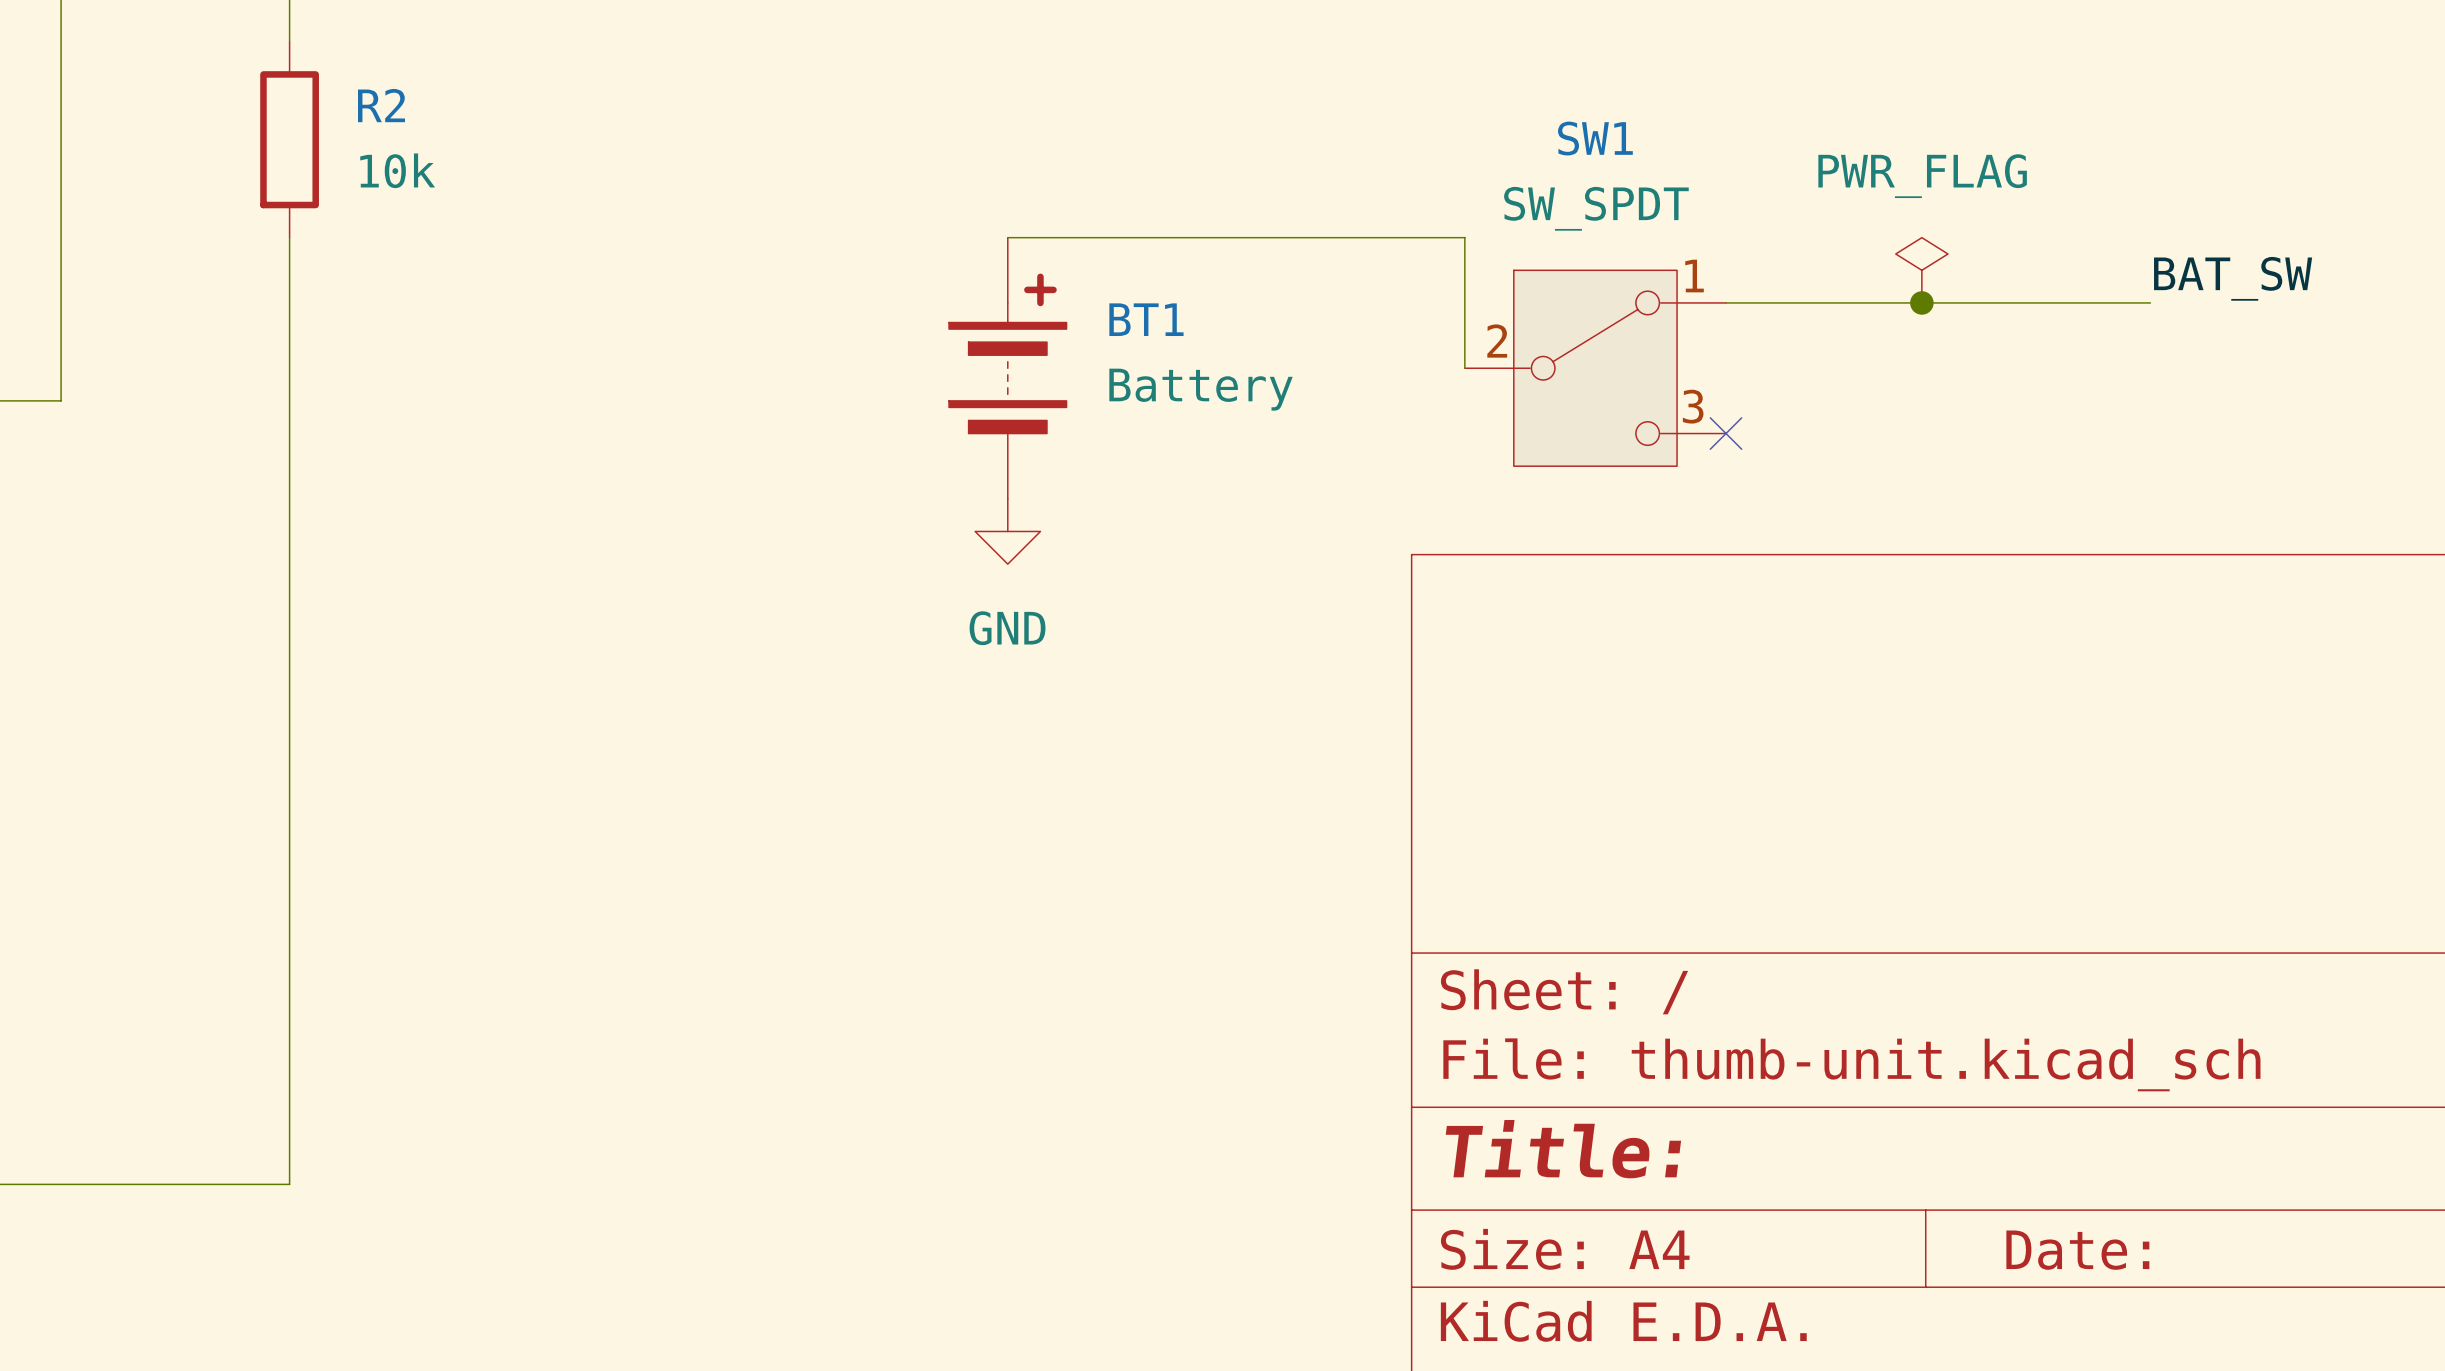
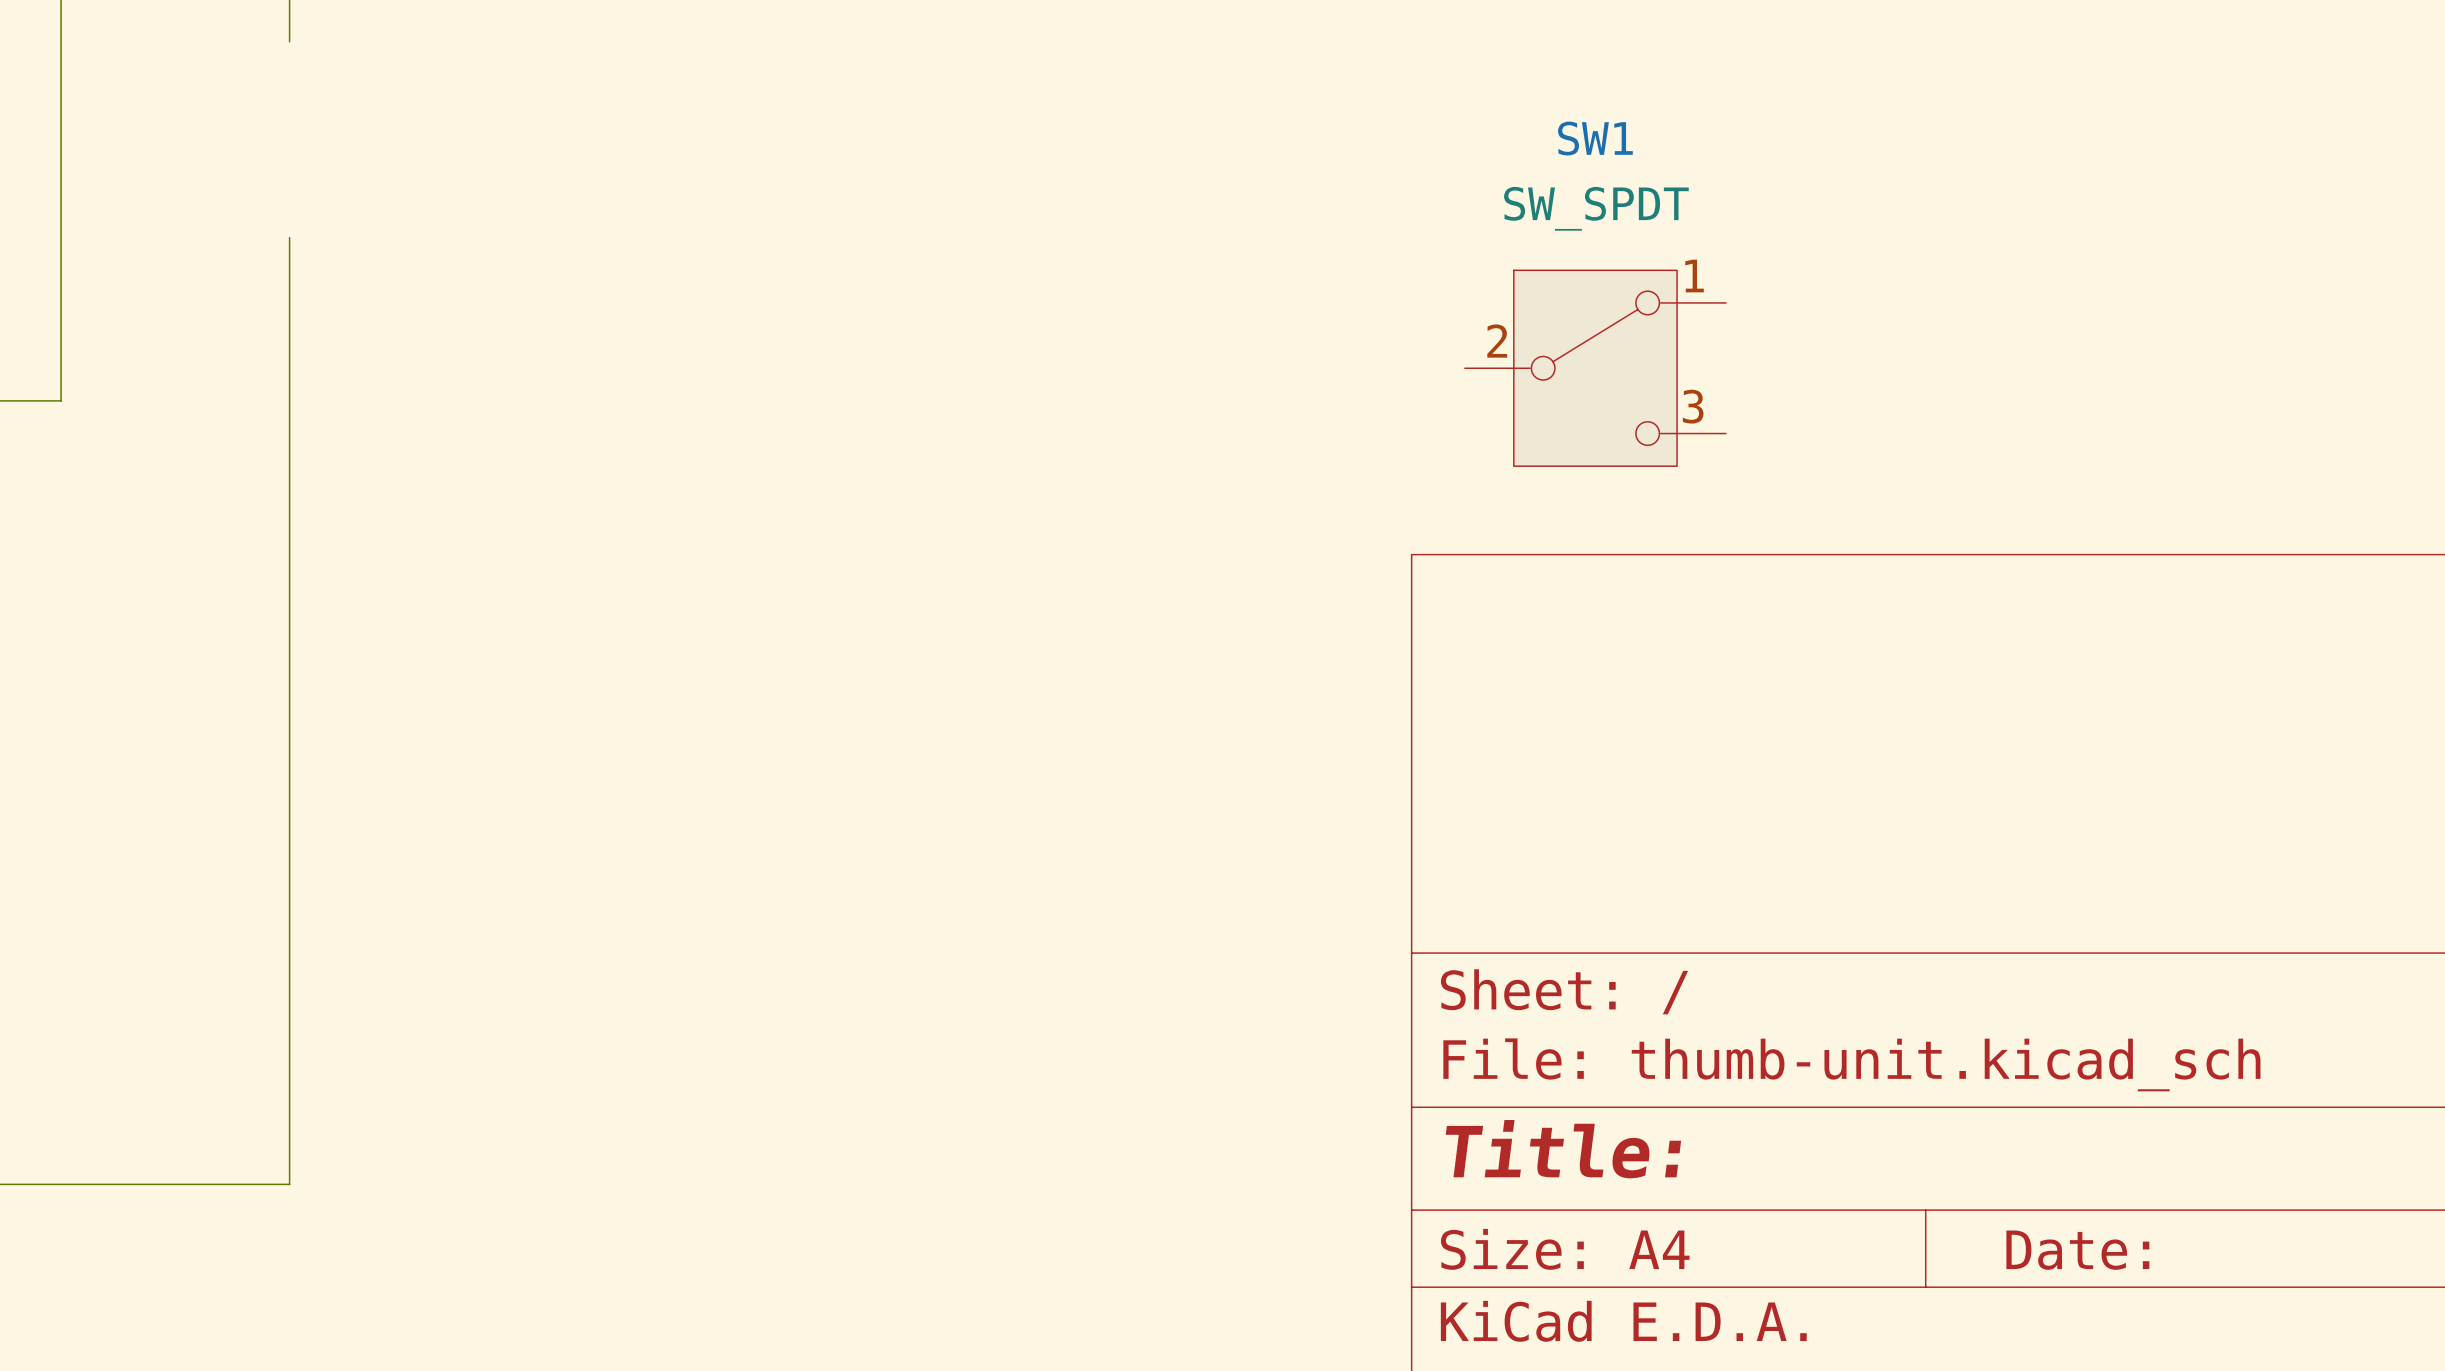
R2: 10k (289, 139) -> none
wire: (1007, 237) (1464, 237) (1464, 368) -> none
power symbol: PWR_FLAG (1921, 270) -> none
label: BAT_SW (2233, 278) -> none
wire: (1726, 302) (2150, 302) -> none
junction: (1921, 302) -> none
BT1: Battery (1007, 368) -> none
no-connect mark: (1726, 433) -> none
power symbol: GND (1007, 531) -> none

